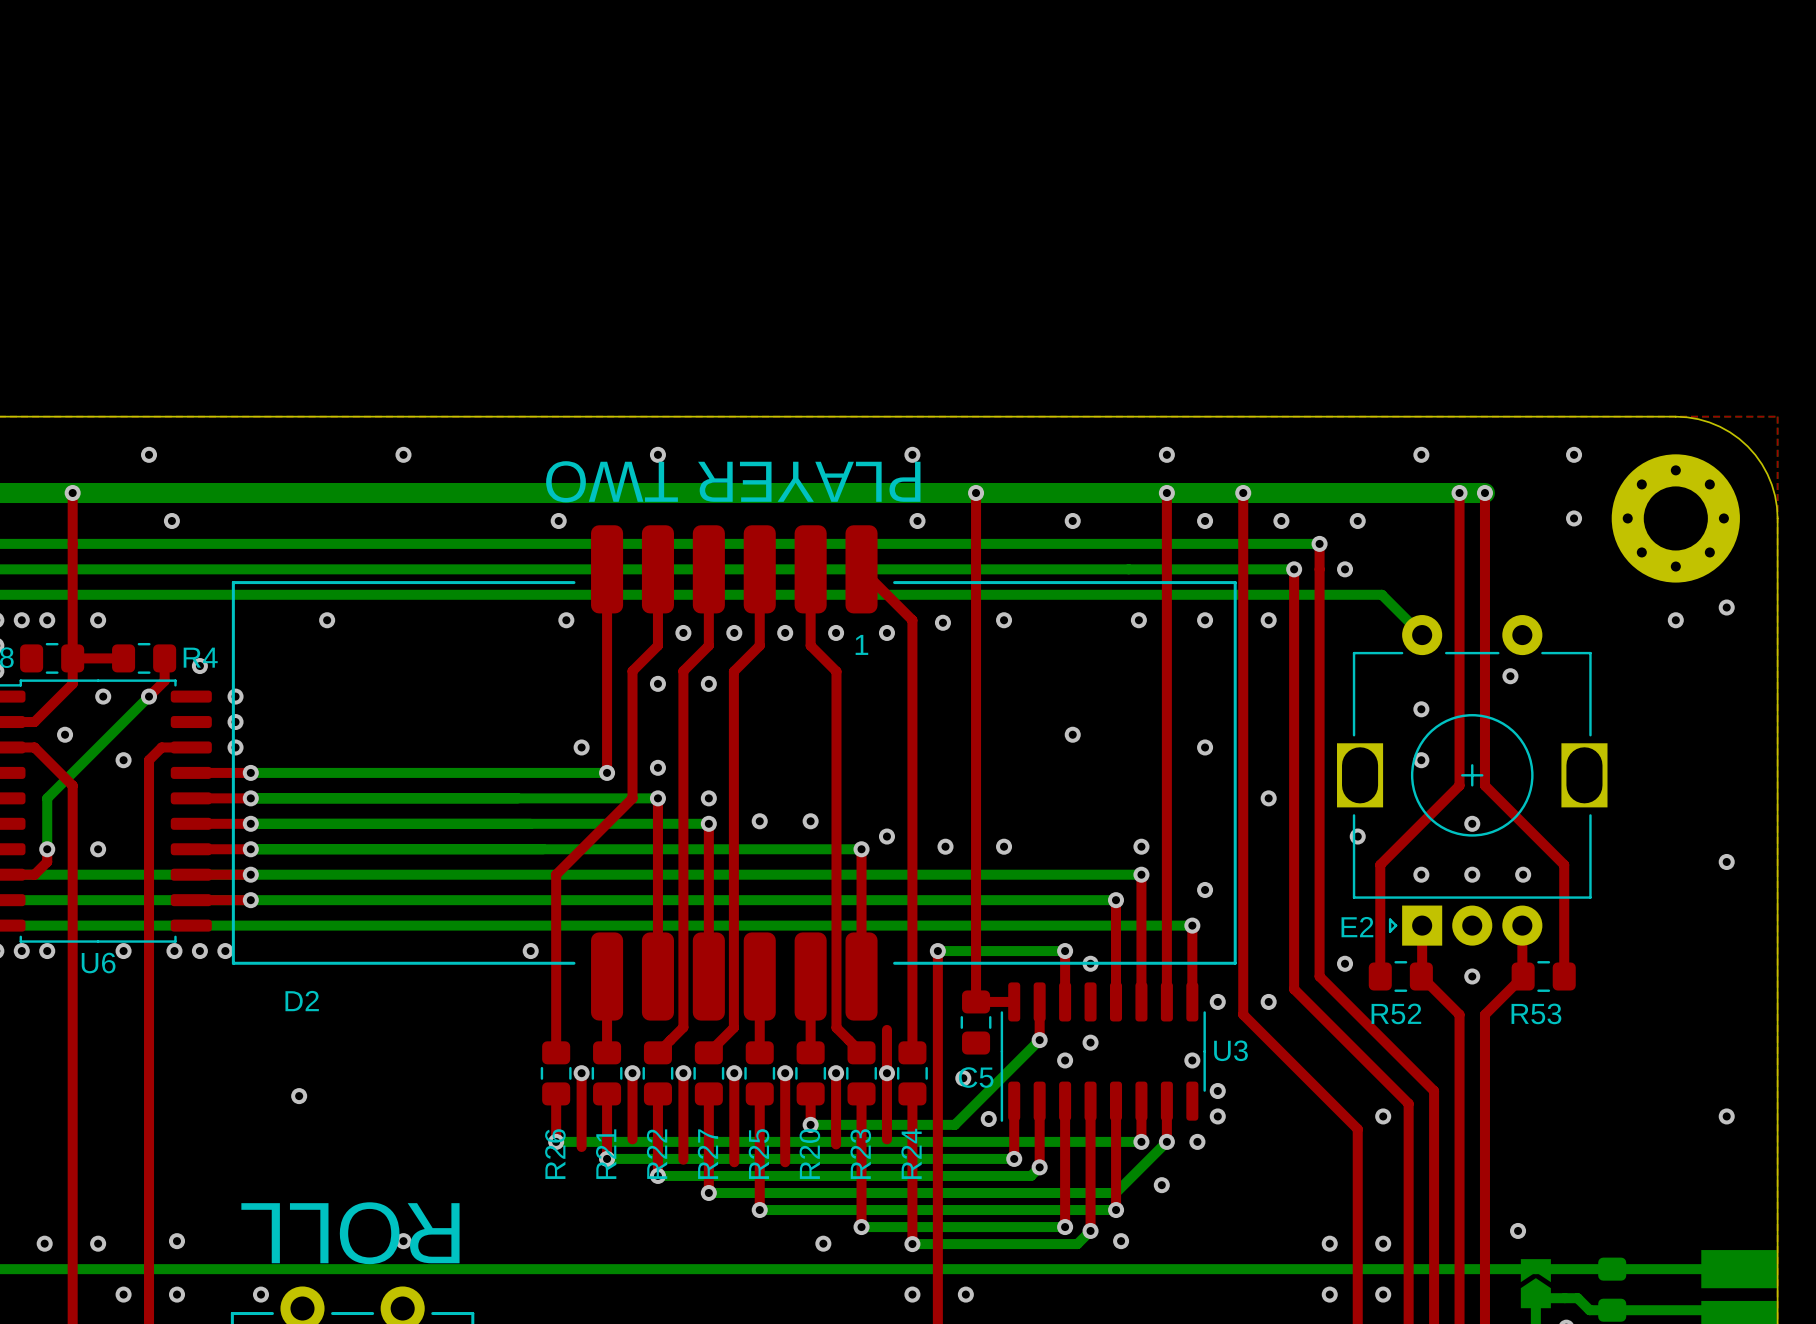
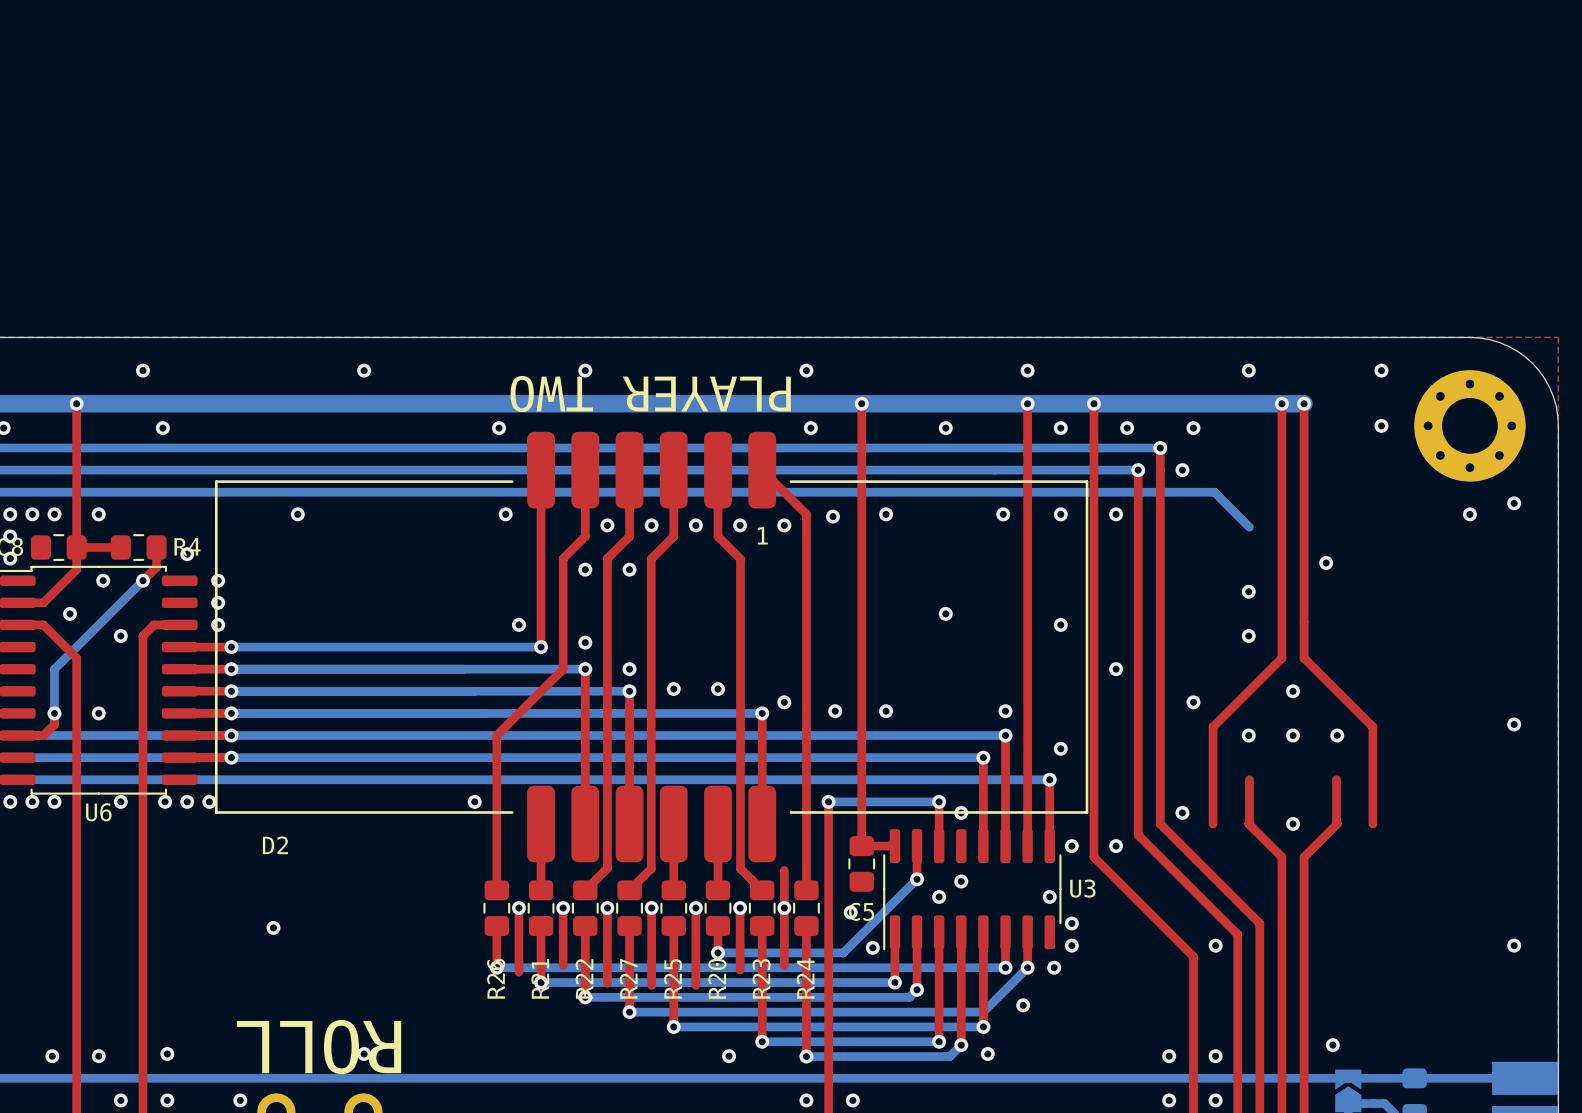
E2: (1472, 780) -> none
R52: (1400, 976) -> none
R53: (1543, 976) -> none

